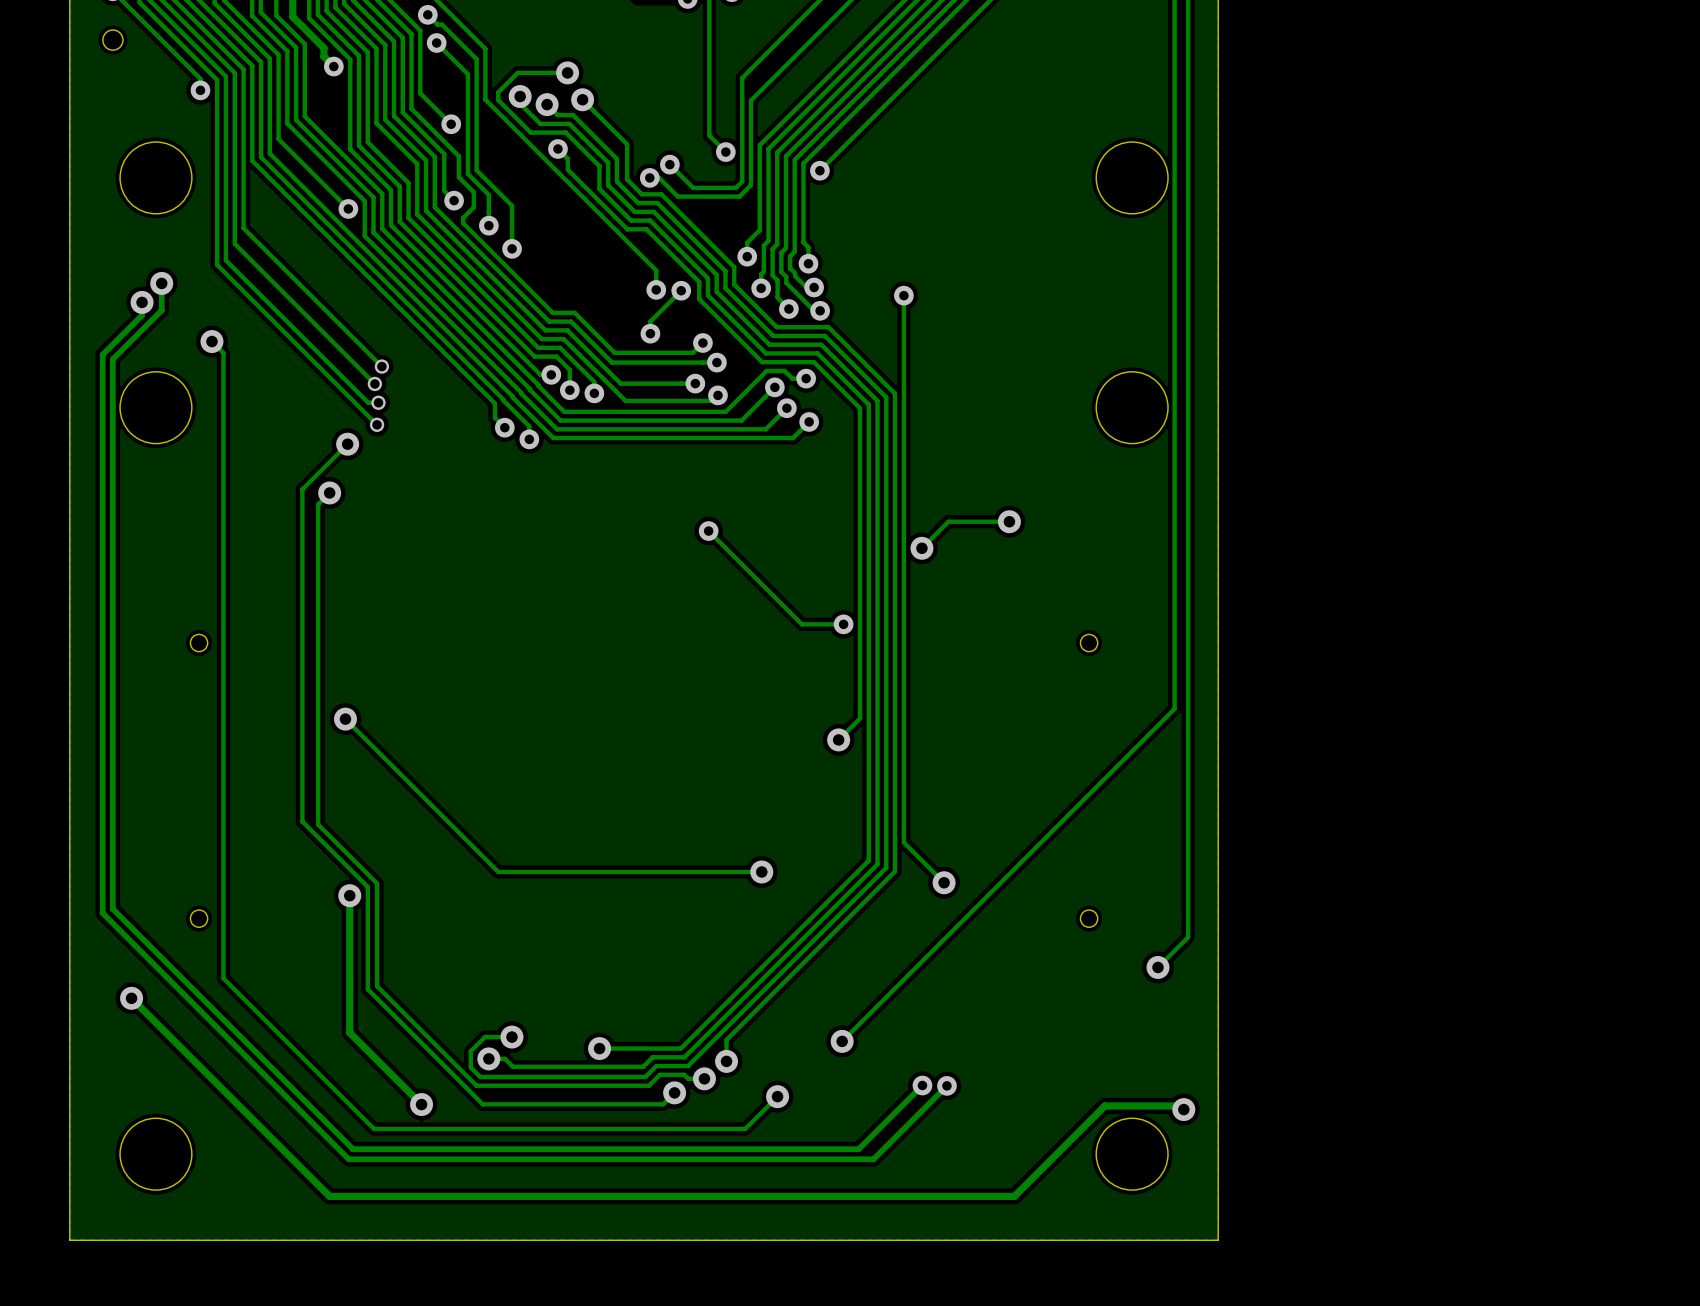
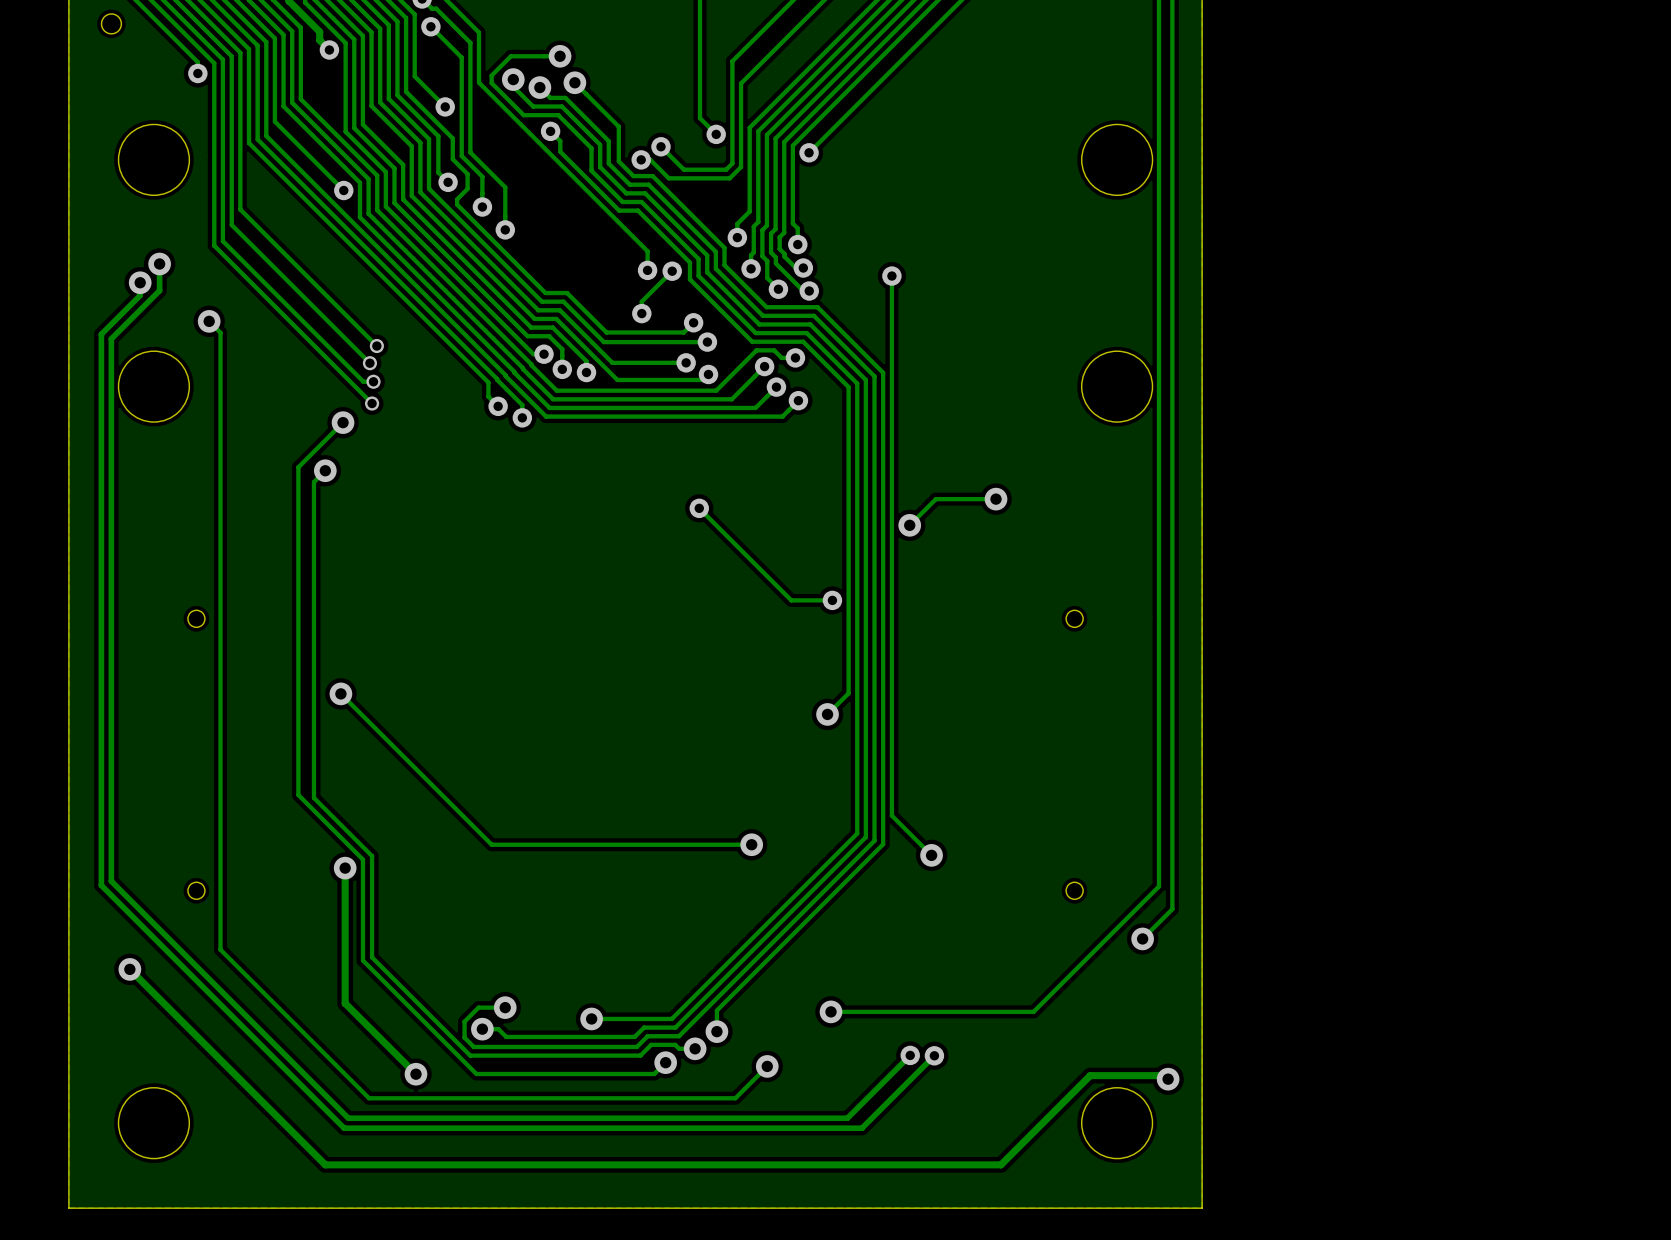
track: (1174, 708) (842, 1041) -> (1159, 683) (1159, 886) (1033, 1011) (831, 1011)

